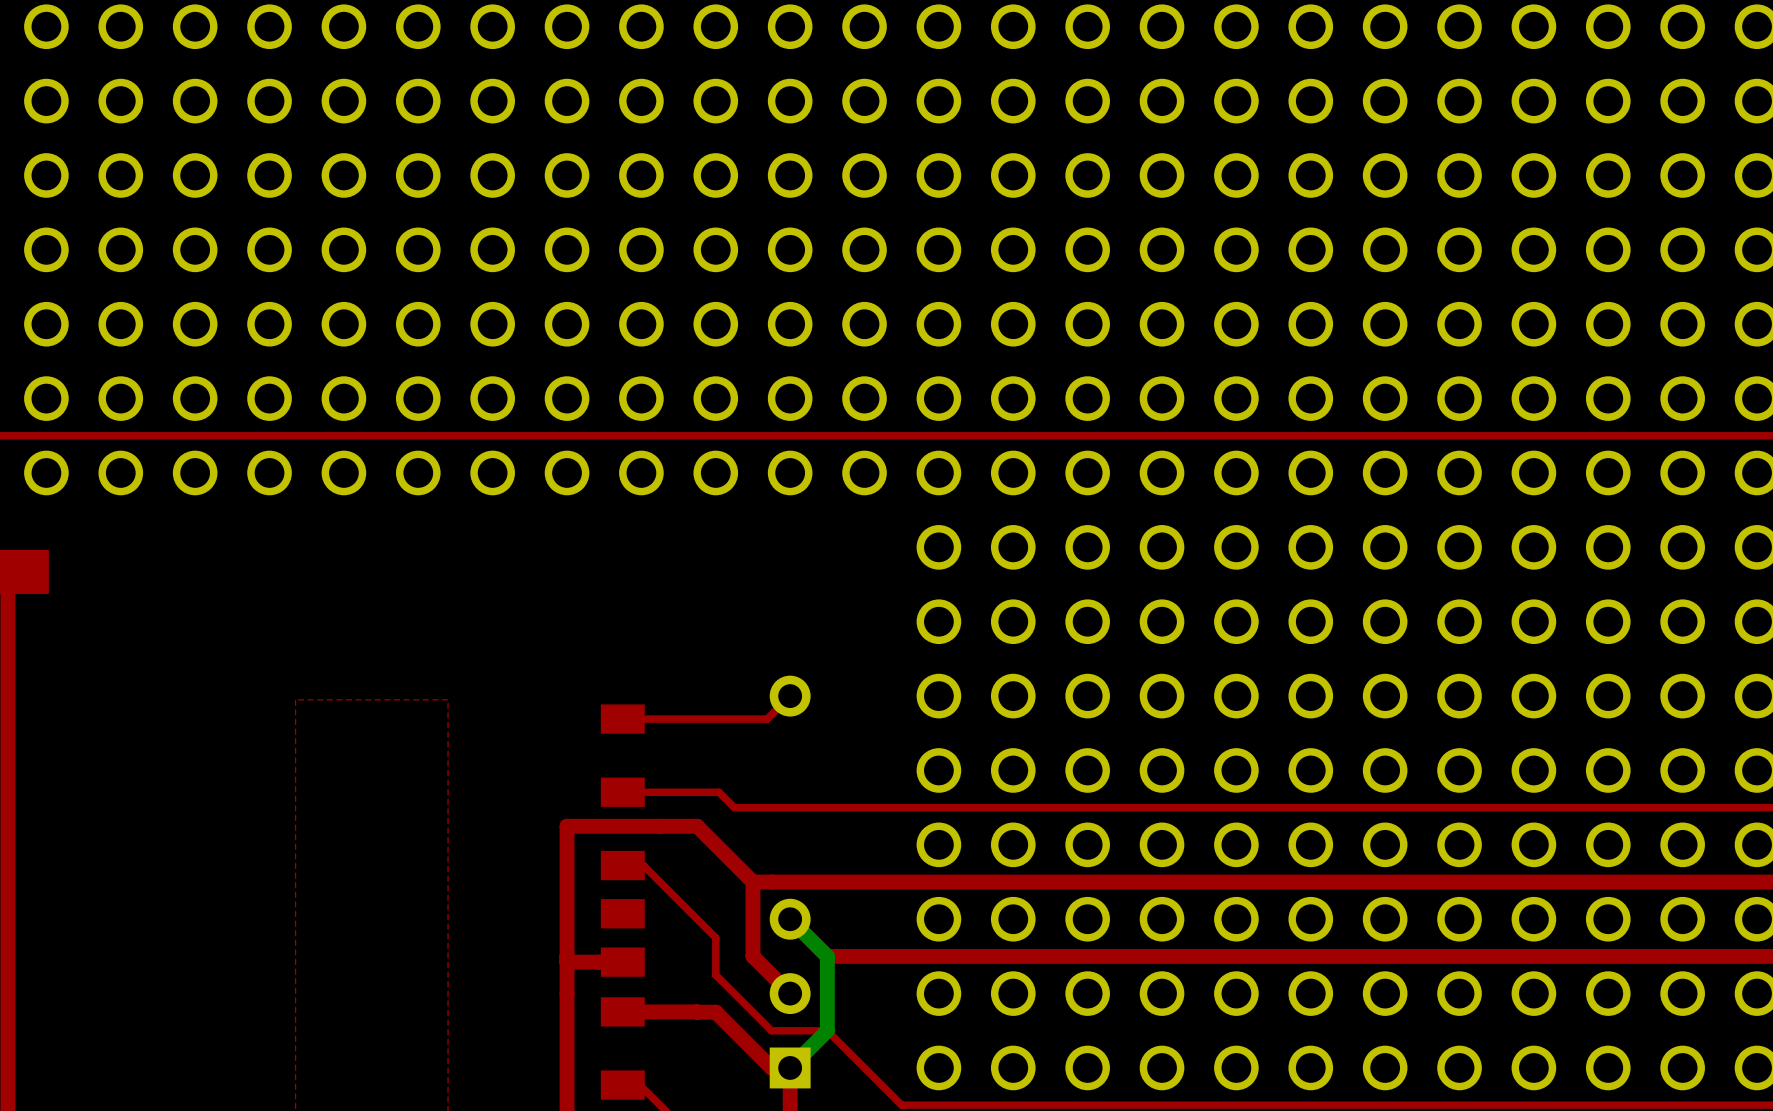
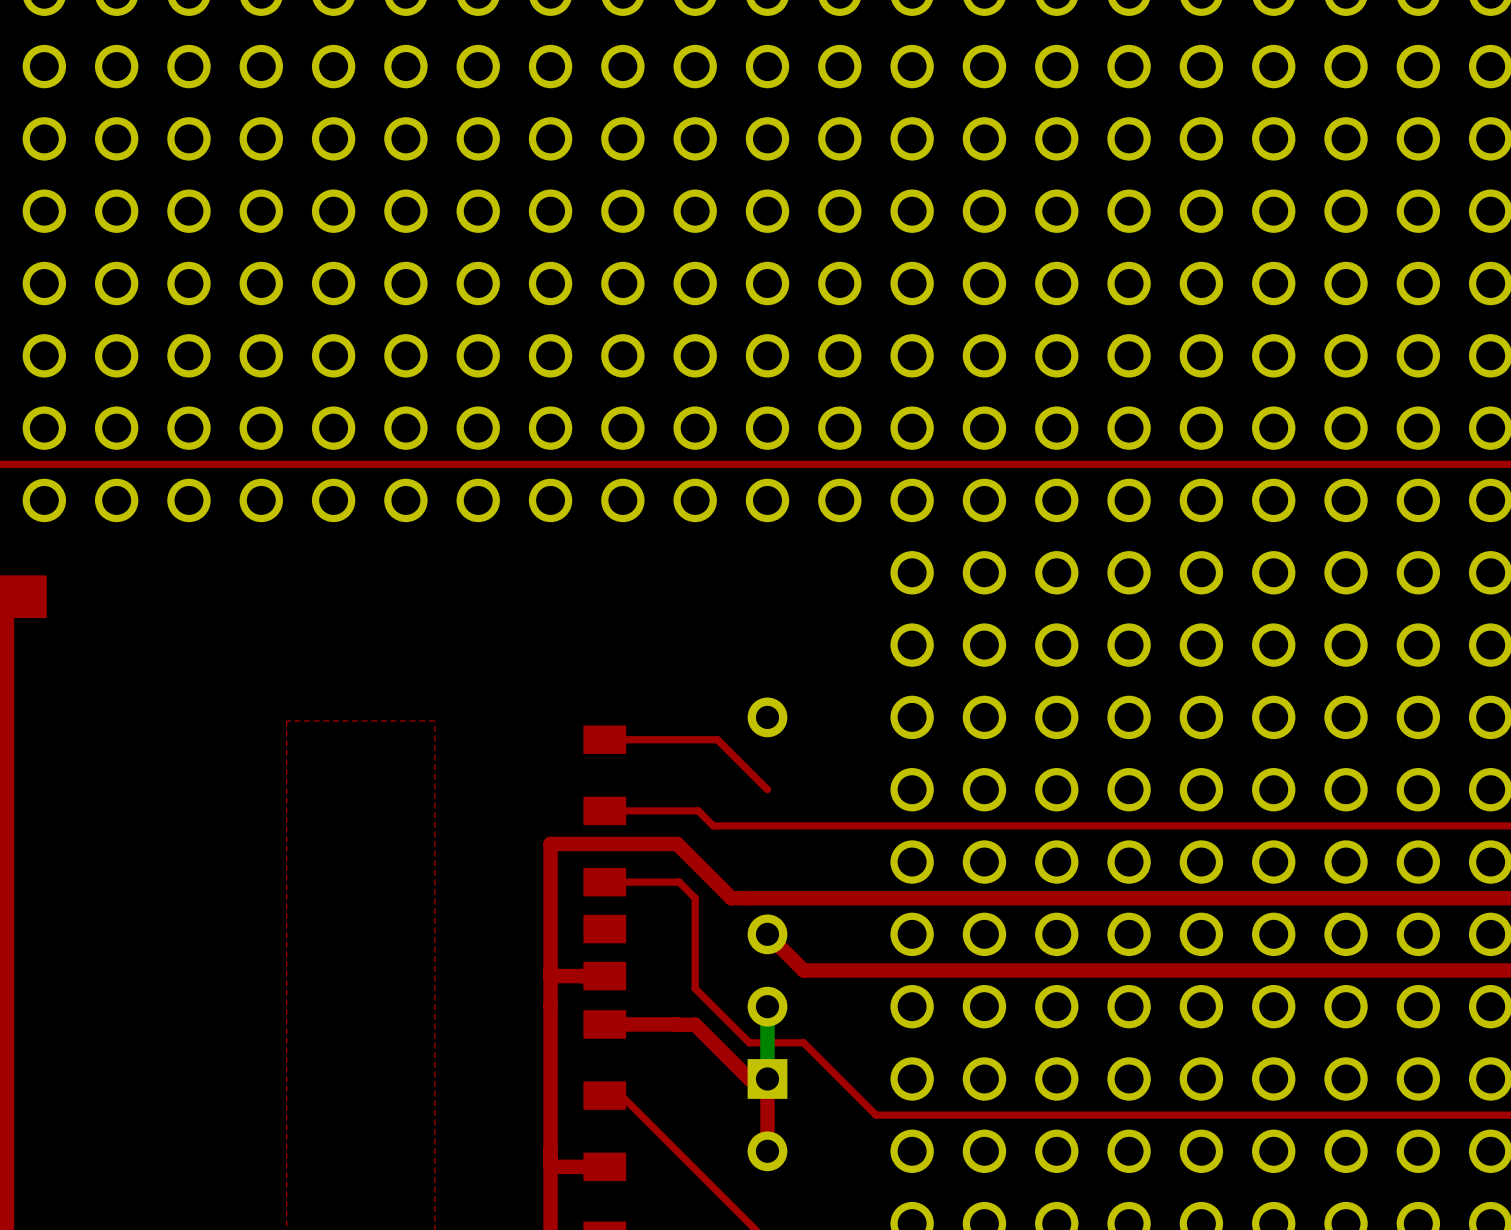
top track: (790, 696) (767, 719) (738, 719) -> (767, 789) (717, 739)
top track: (643, 865) (715, 937) -> (624, 882) (679, 882) (695, 898) (695, 952)
top track: (752, 882) (752, 956) (790, 993) -> none
bottom track: (790, 919) (827, 956) (827, 1030) (790, 1067) -> (767, 1006) (767, 1078)

